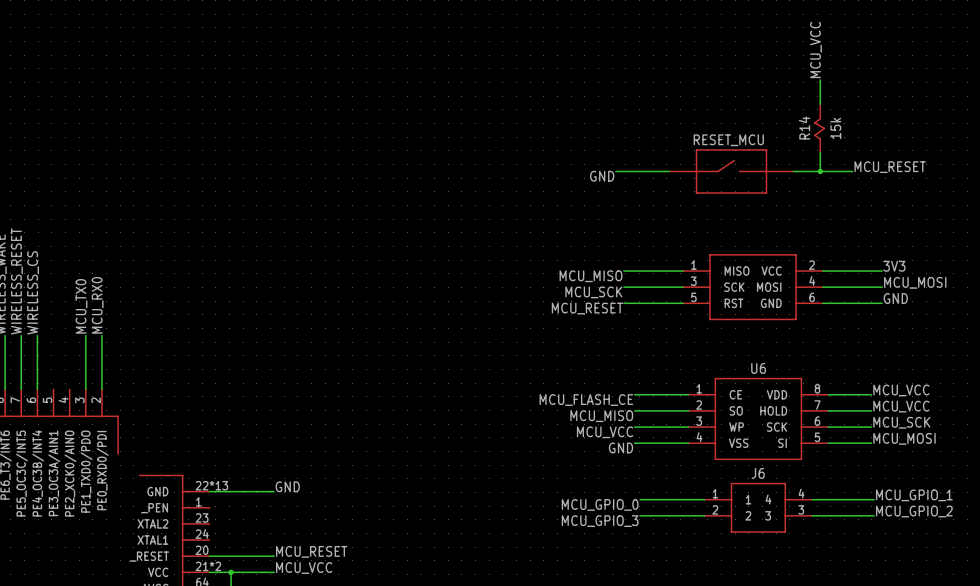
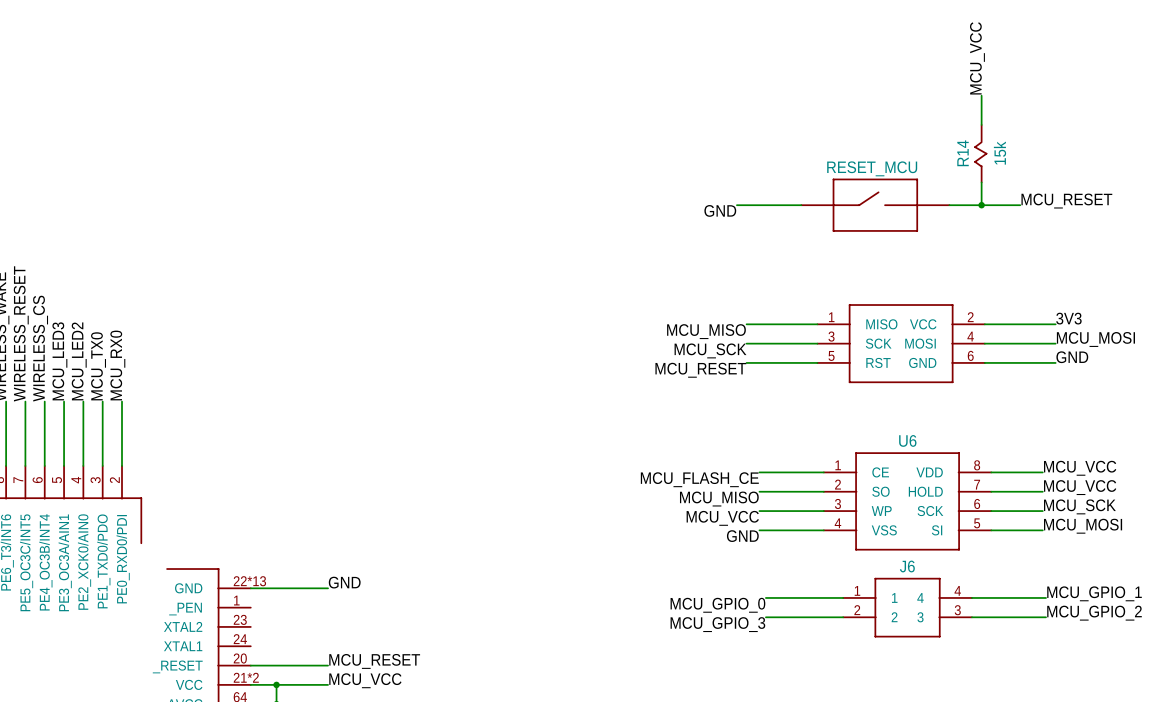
label: none -> MCU_LED3 (59, 361)
label: none -> MCU_LED2 (79, 361)
wire: none -> (64, 401) (64, 465)
wire: none -> (83, 401) (83, 465)

